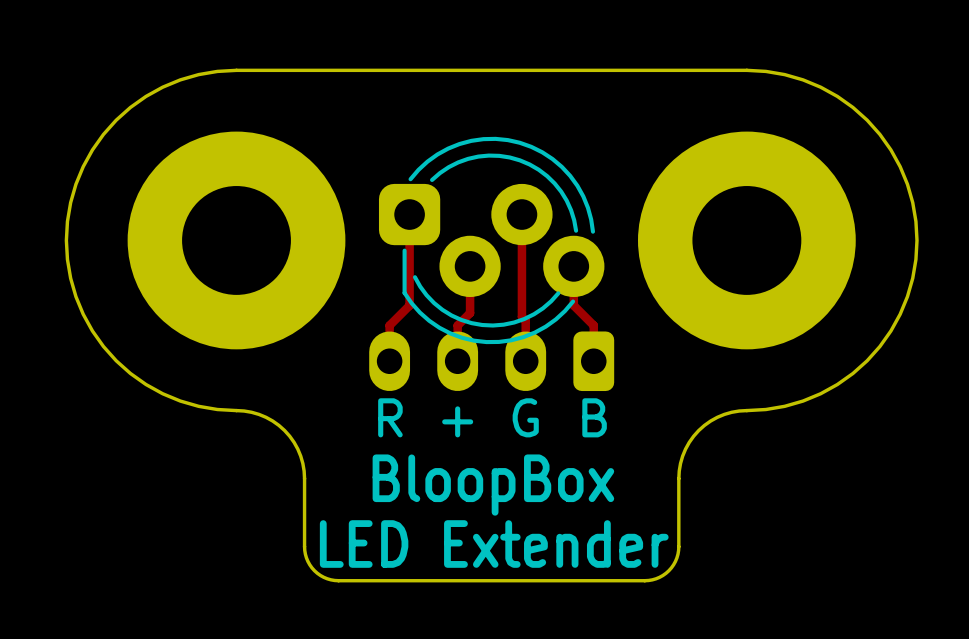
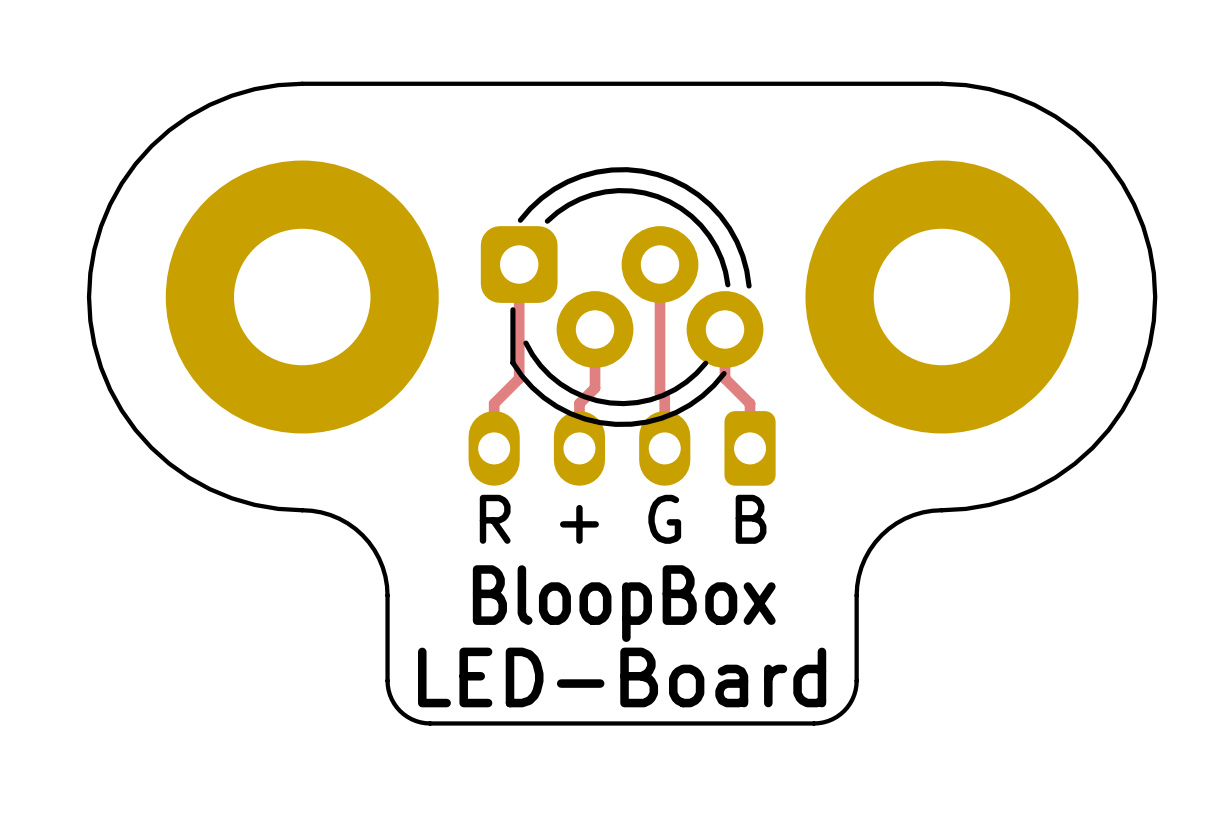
text: LED Extender (494, 544) -> LED-Board (622, 677)

